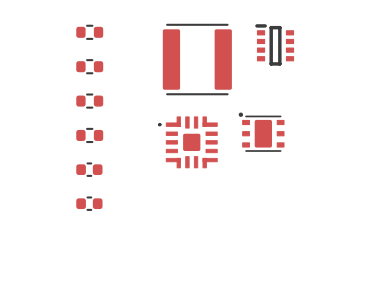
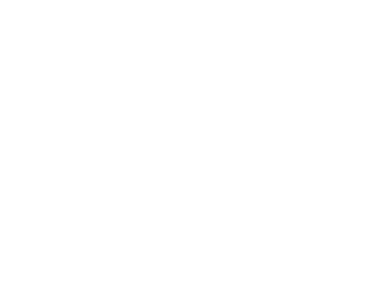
part: (89, 32) -> none
part: (274, 44) -> none
part: (197, 59) -> none
part: (89, 66) -> none
part: (89, 101) -> none
part: (261, 132) -> none
part: (89, 135) -> none
part: (187, 142) -> none
part: (89, 169) -> none
part: (89, 203) -> none

